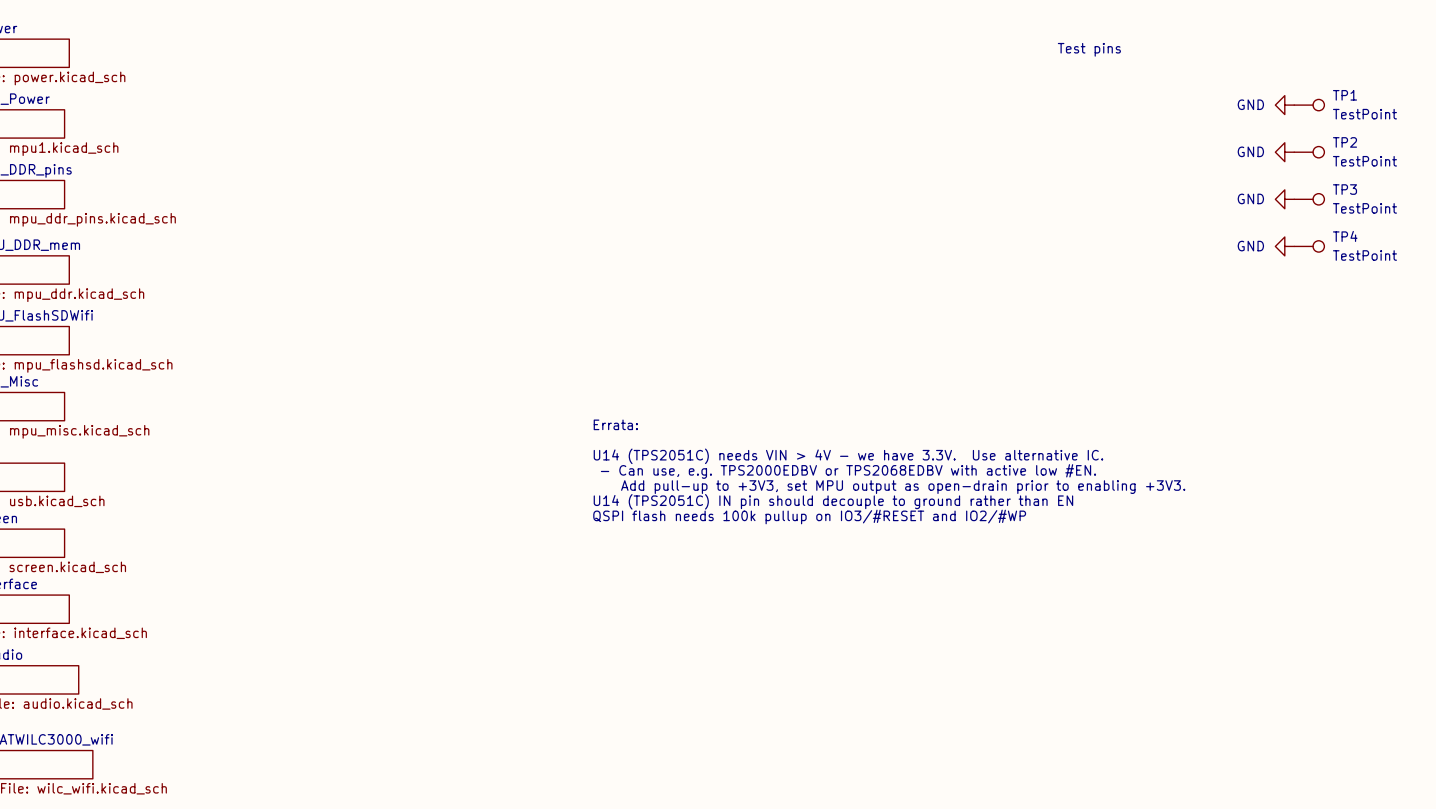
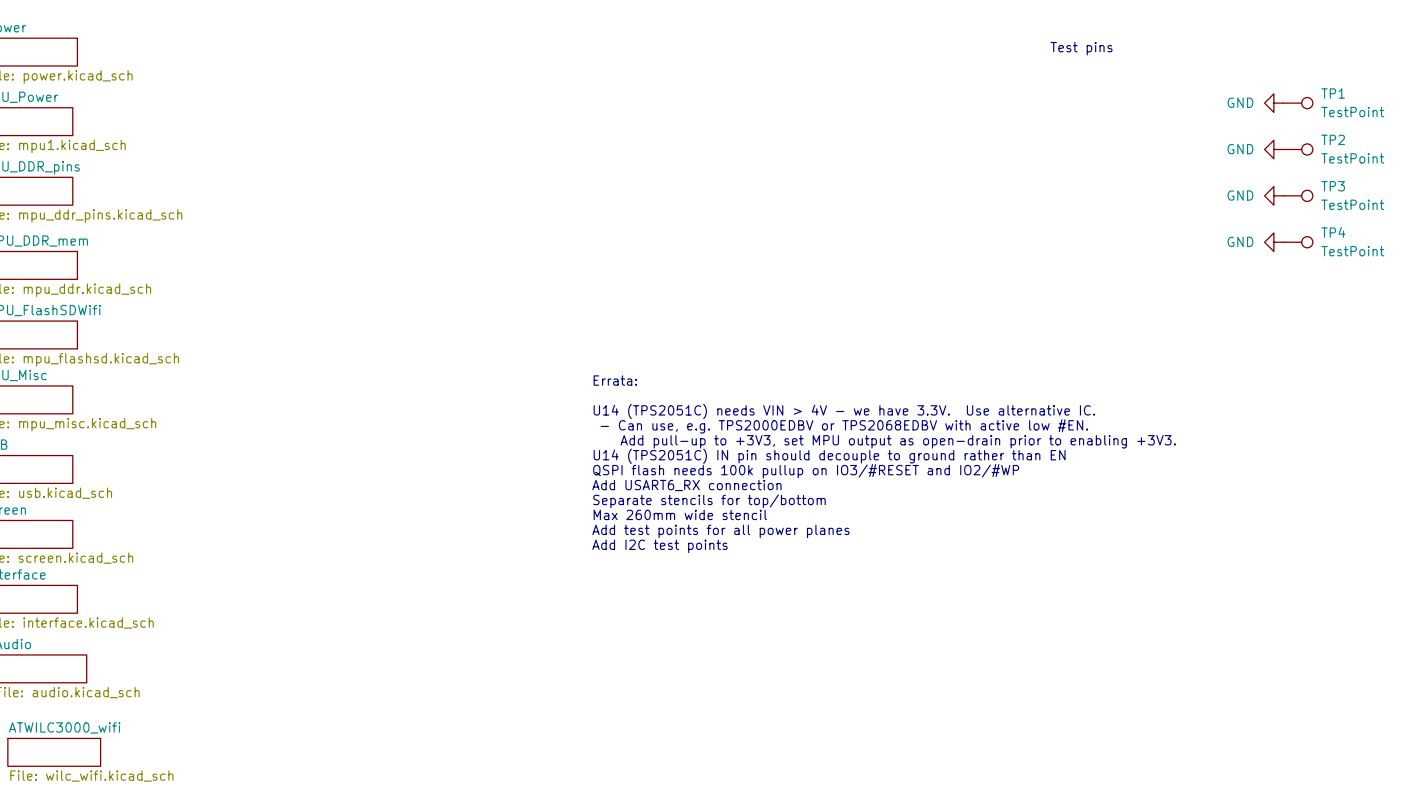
text position: Errata: (615, 424) -> Errata: (615, 380)
text position: U14 (TPS2051C) needs VIN > 4V - we have 3.3V. Use alternative IC. (848, 456) -> U14 (TPS2051C) needs VIN > 4V - we have 3.3V. Use alternative IC. (844, 411)
text position: - Can use, e.g. TPS2000EDBV or TPS2068EDBV with active low #EN. (848, 471) -> - Can use, e.g. TPS2000EDBV or TPS2068EDBV with active low #EN. (844, 426)
text position: Add pull-up to +3V3, set MPU output as open-drain prior to enabling +3V3. (903, 487) -> Add pull-up to +3V3, set MPU output as open-drain prior to enabling +3V3. (898, 441)
text: none -> Add USART6_RX connection (686, 485)
text position: U14 (TPS2051C) IN pin should decouple to ground rather than EN (833, 501) -> U14 (TPS2051C) IN pin should decouple to ground rather than EN (829, 456)
text: none -> Separate stencils for top/bottom (709, 501)
text position: QSPI flash needs 100k pullup on IO3/#RESET and IO2/#WP (809, 516) -> QSPI flash needs 100k pullup on IO3/#RESET and IO2/#WP (806, 471)
text: none -> Max 260mm wide stencil (680, 514)
text: none -> Add test points for all power planes (720, 531)
text: none -> Add I2C test points (660, 546)

